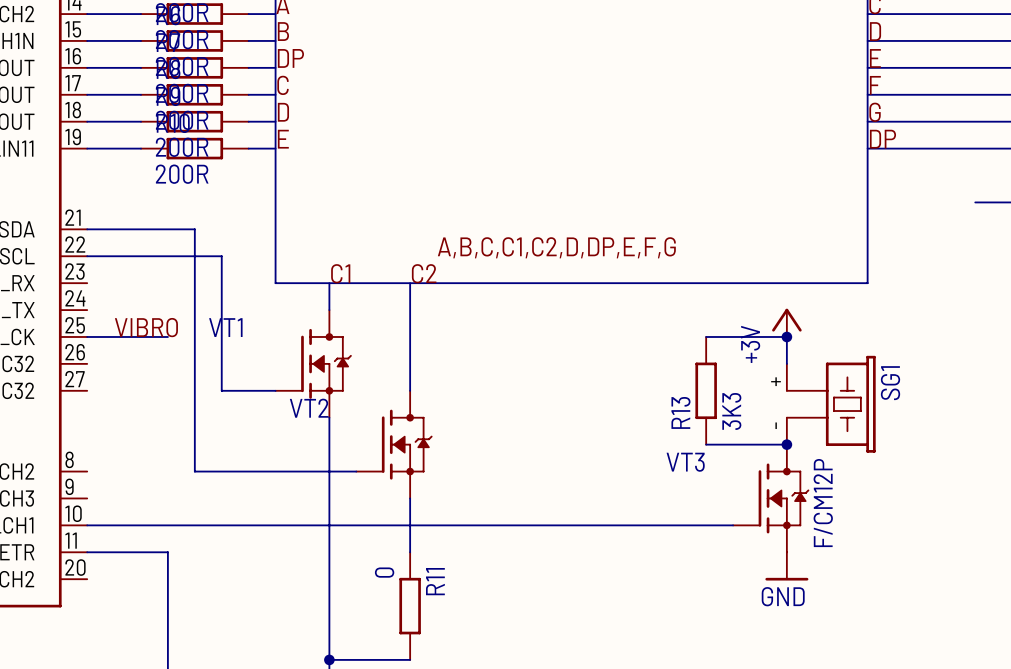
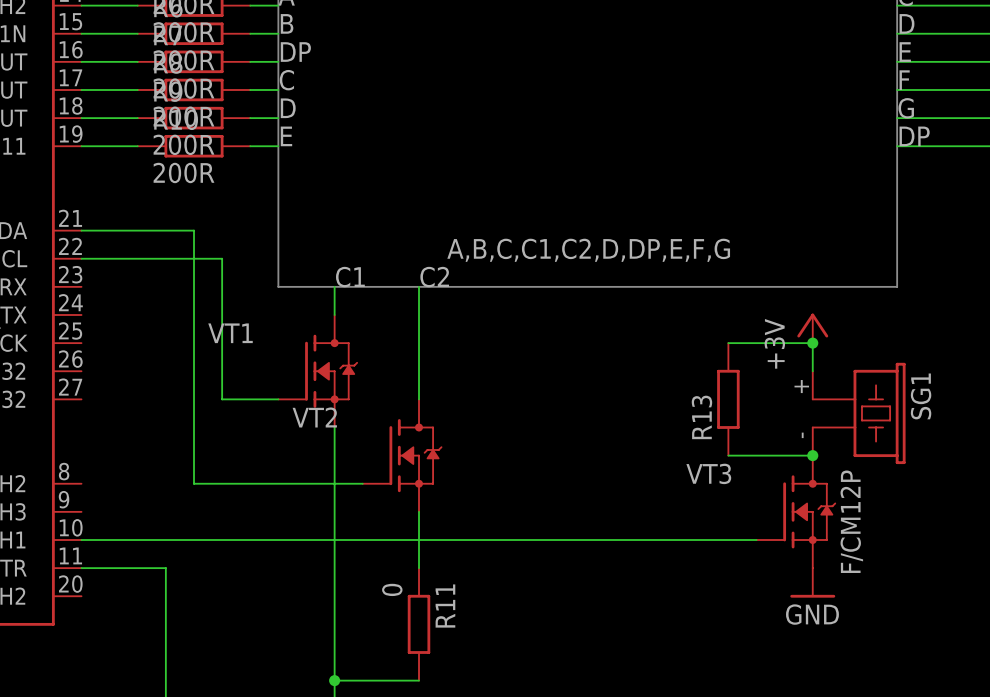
label: VIBRO (146, 327) -> none
wire: (87, 336) (167, 336) -> none
R13 value: 3K3 (731, 411) -> none

